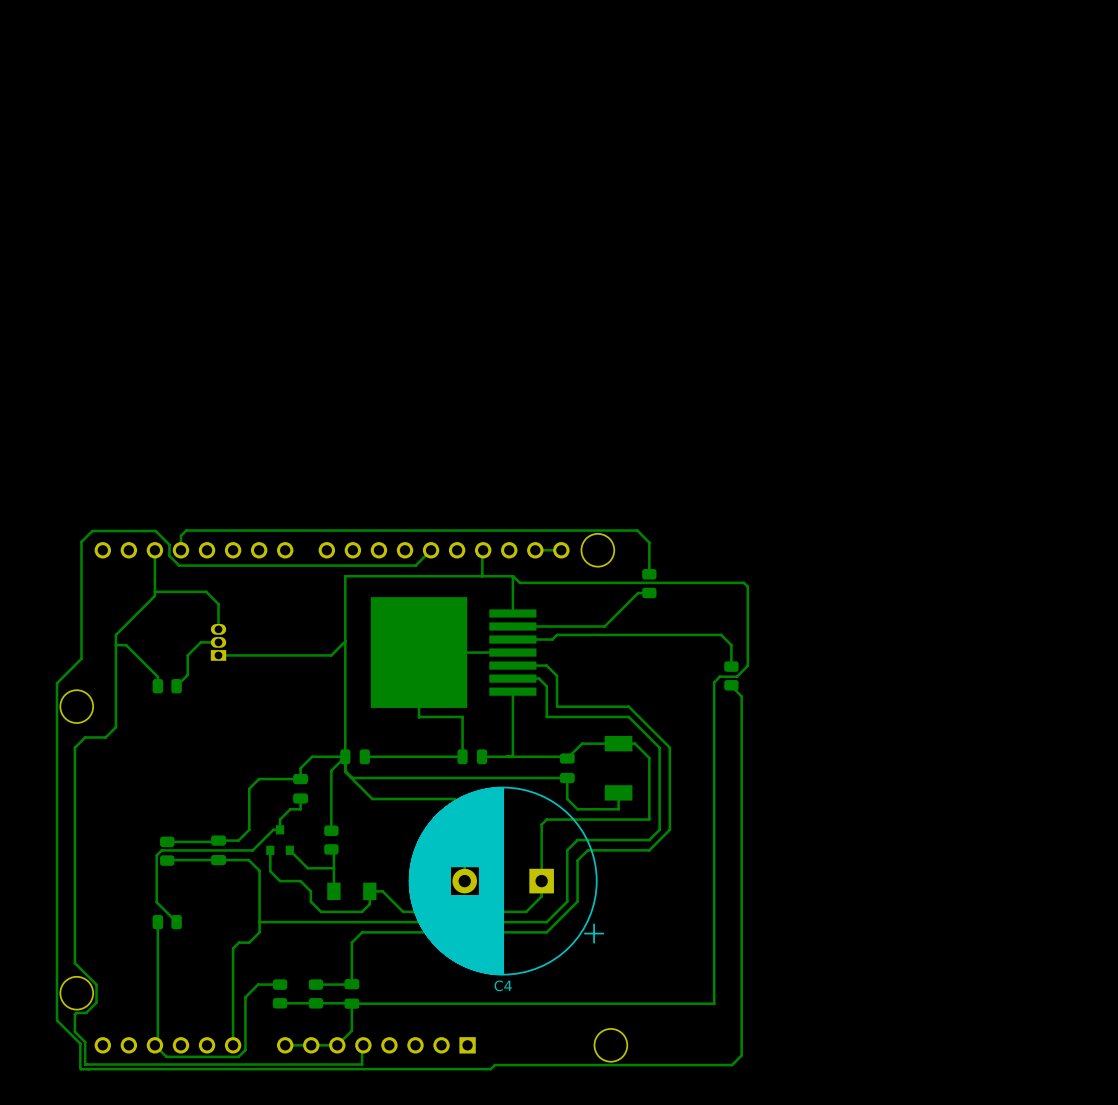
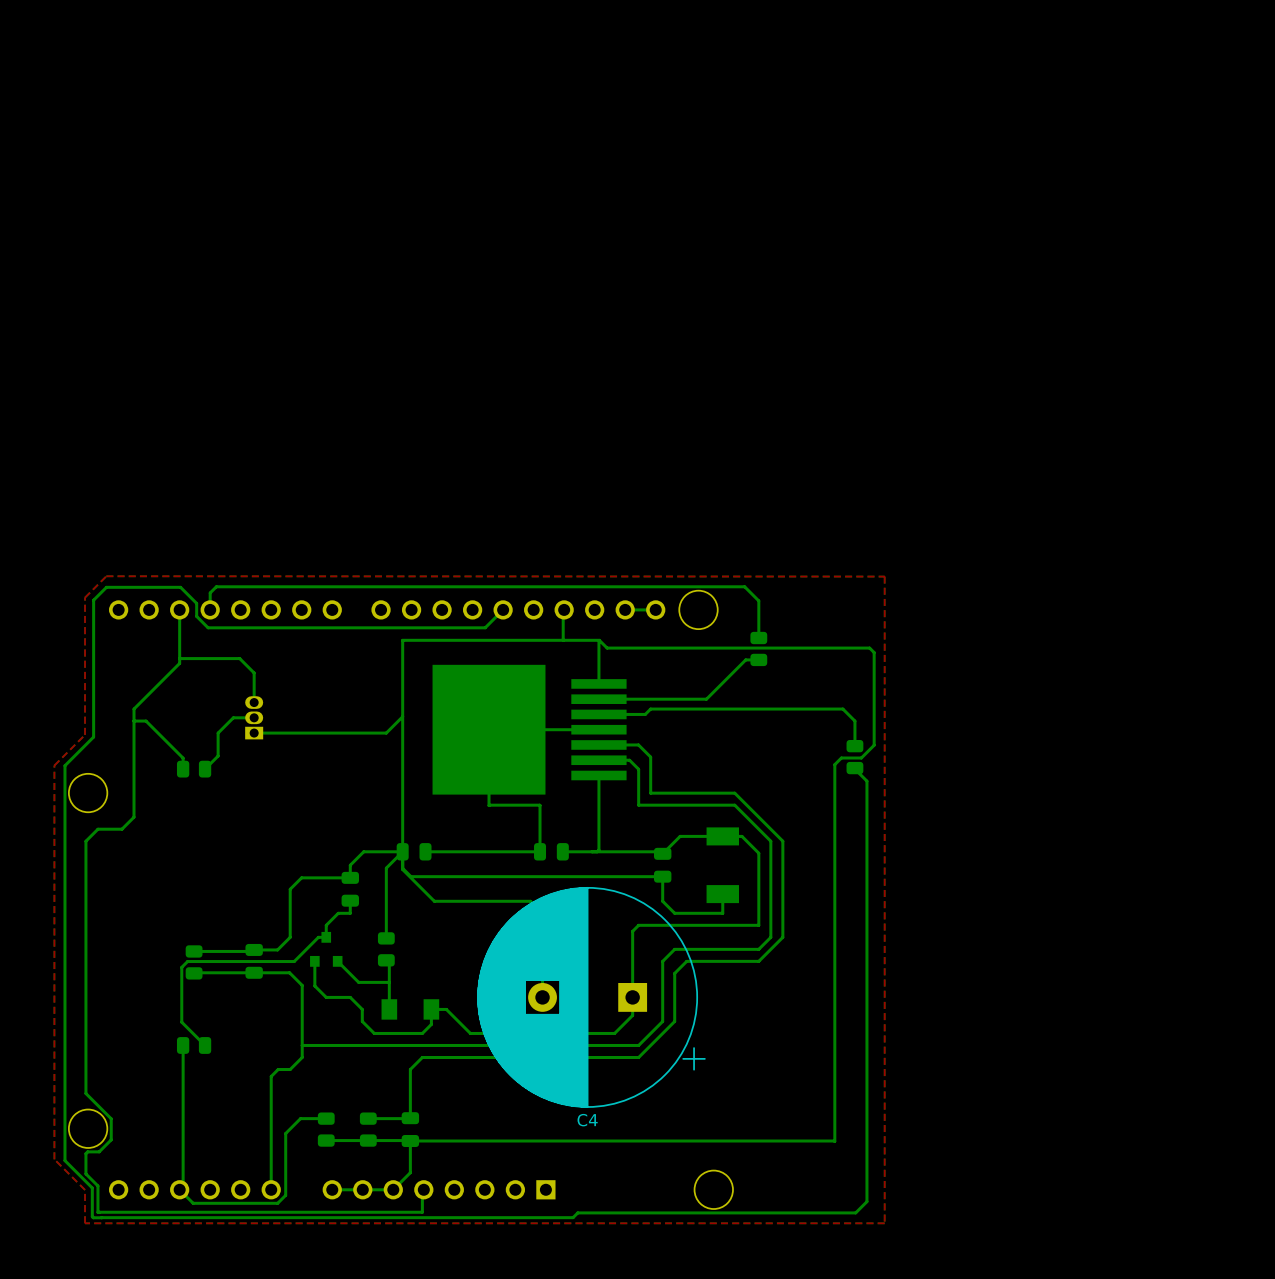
top zone outline: none -> (106, 576) (85, 597) (85, 734) (54, 765) (54, 1159) (85, 1189) (85, 1223) (884, 1223) (884, 576) (106, 576)

